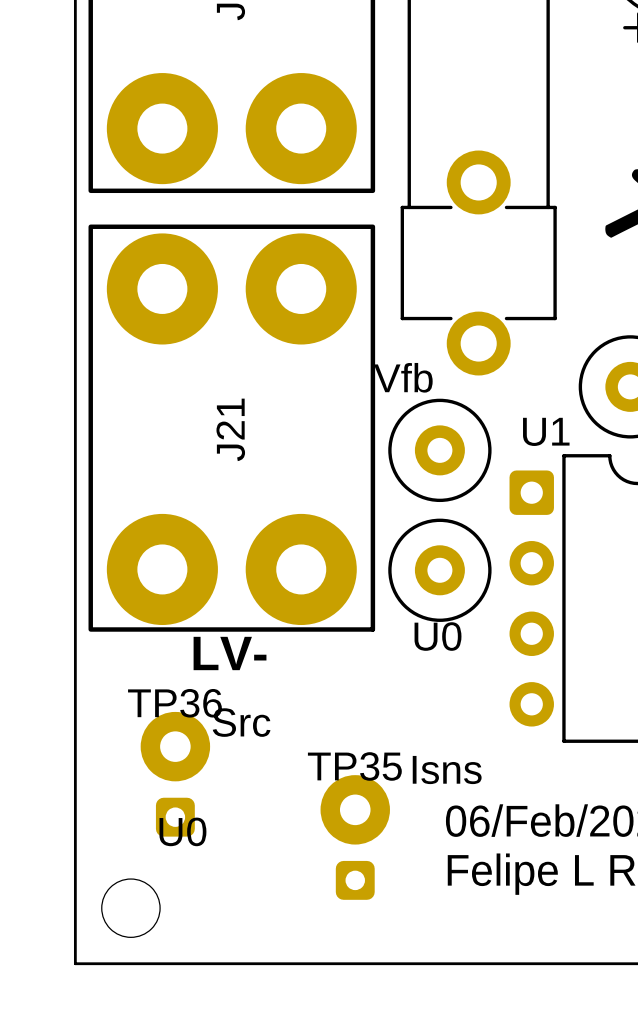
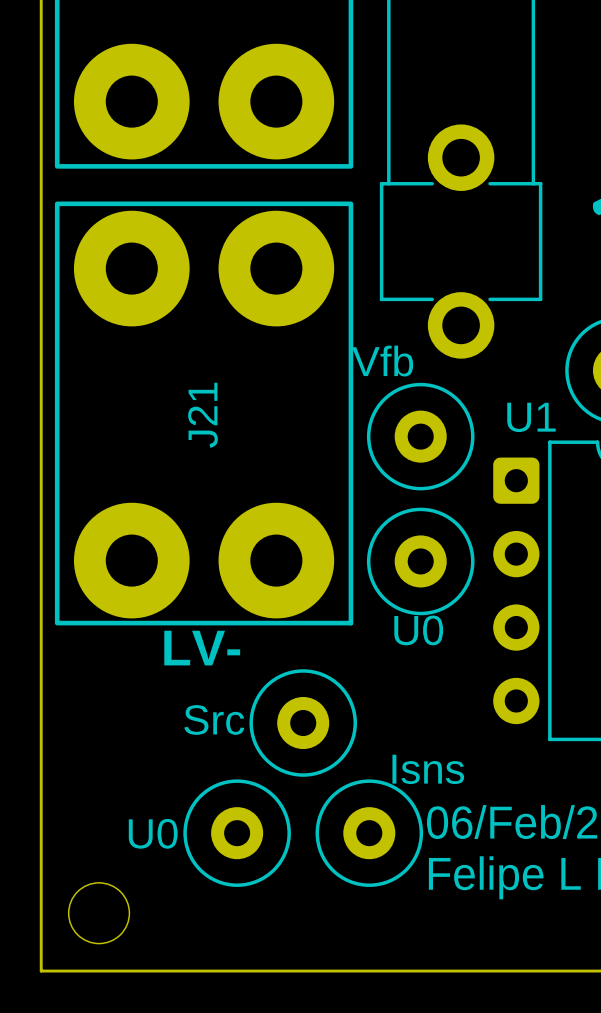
part: none -> (303, 723)
TP36: (175, 774) -> none
part: none -> (237, 833)
part: none -> (369, 833)
TP35: (355, 837) -> none

